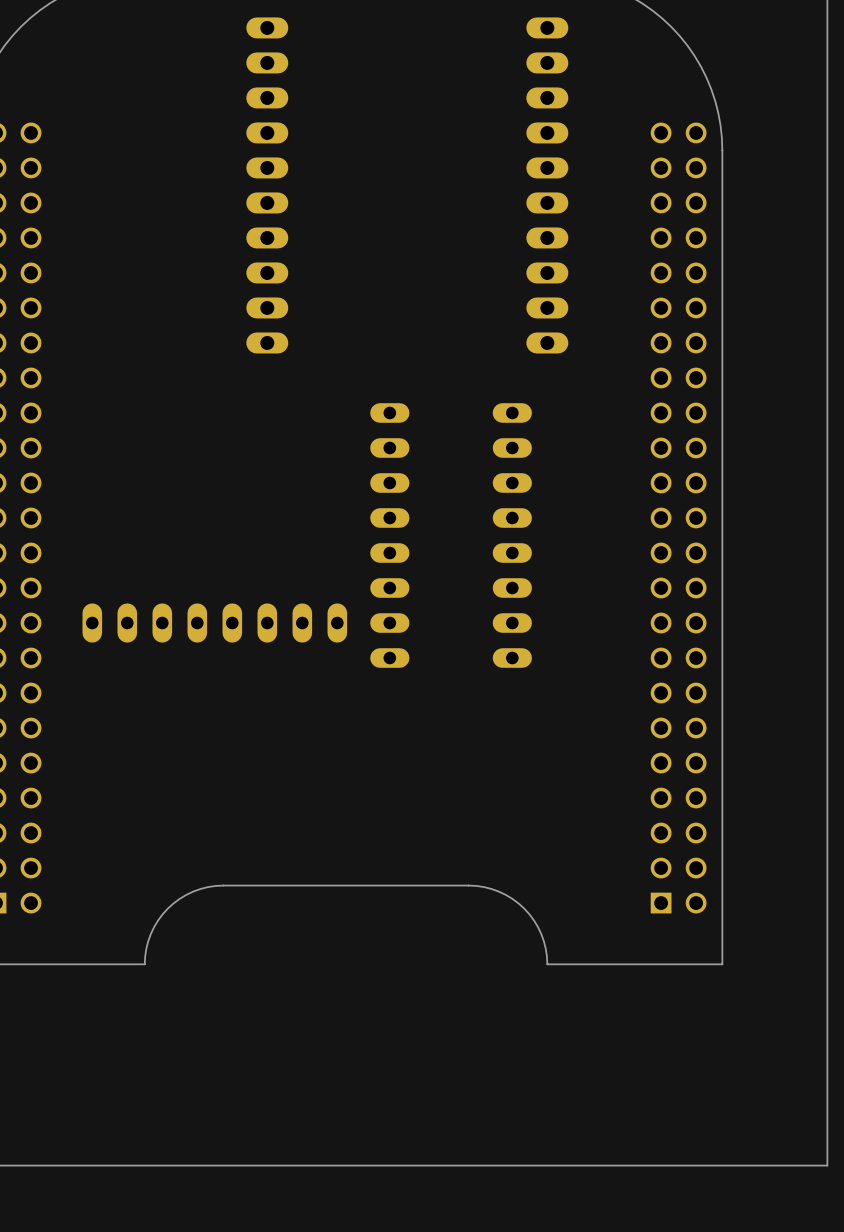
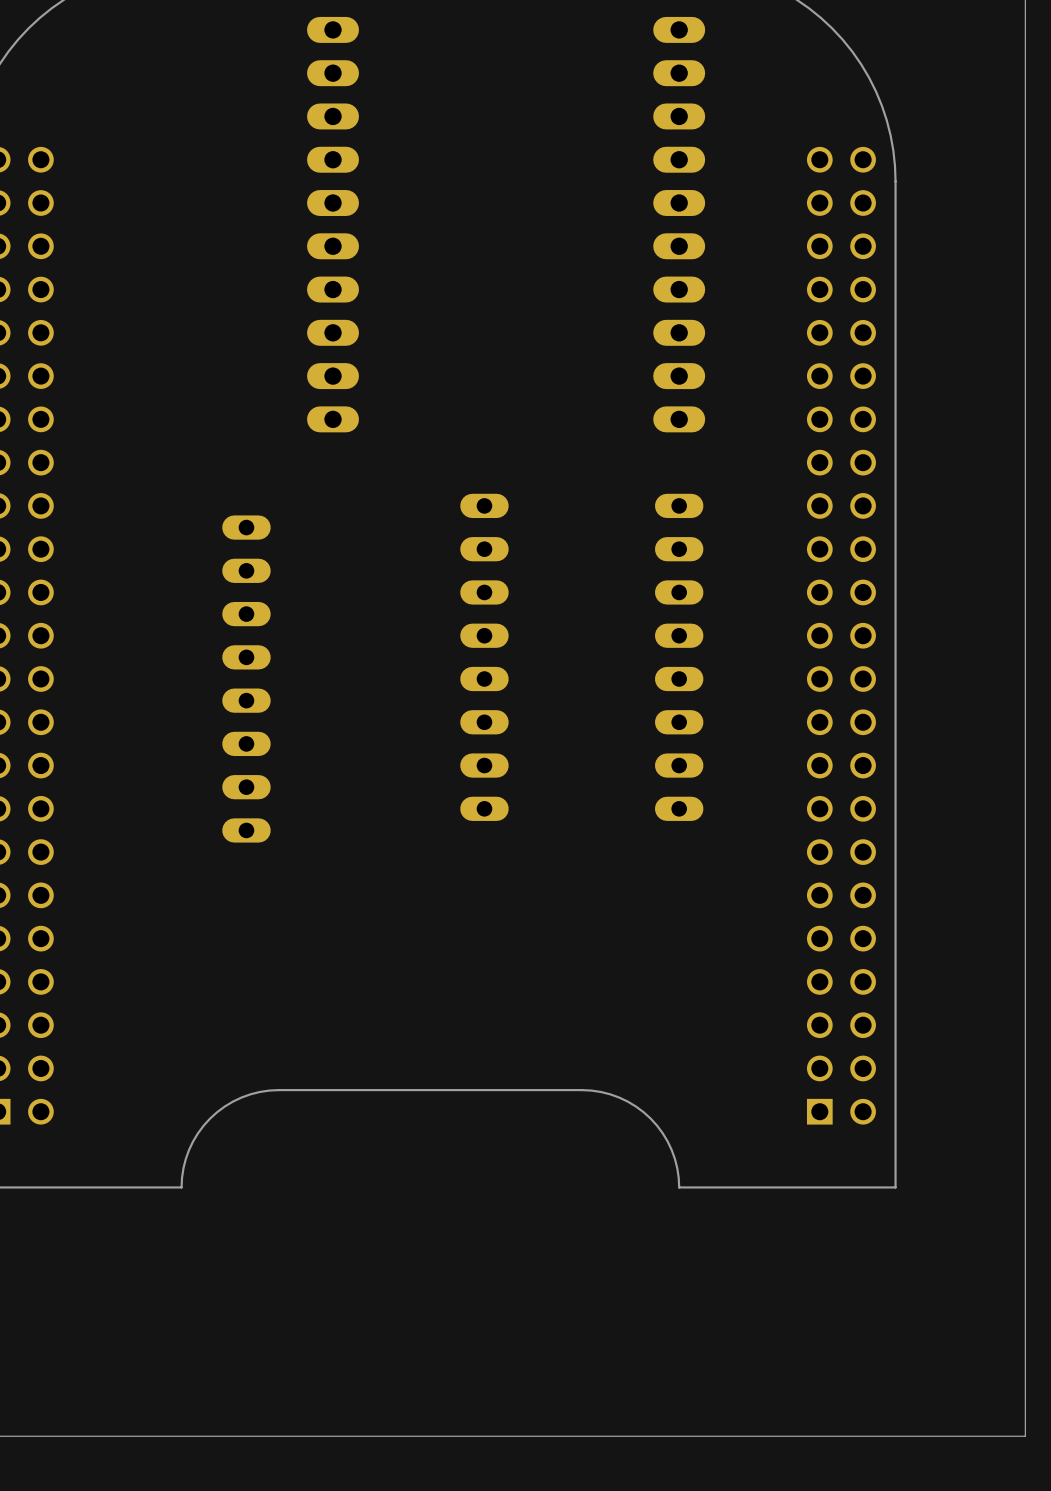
part position: (512, 535) -> (679, 657)
part rotation: 0° (214, 623) -> 90° clockwise (246, 679)

